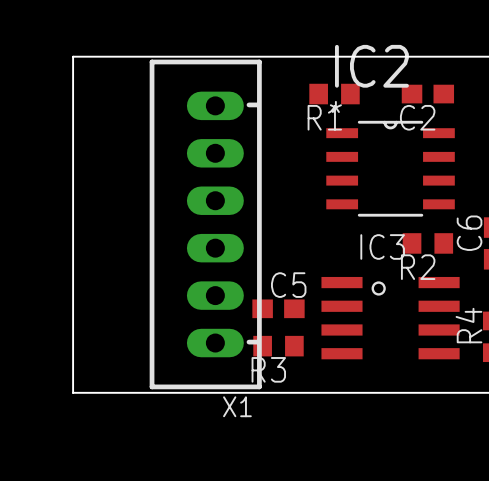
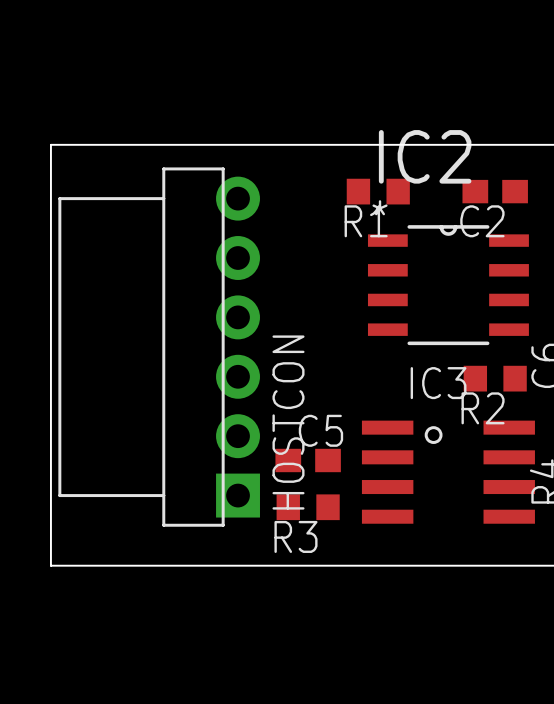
HOSTCON: none -> (159, 347)
X1: (205, 224) -> none

